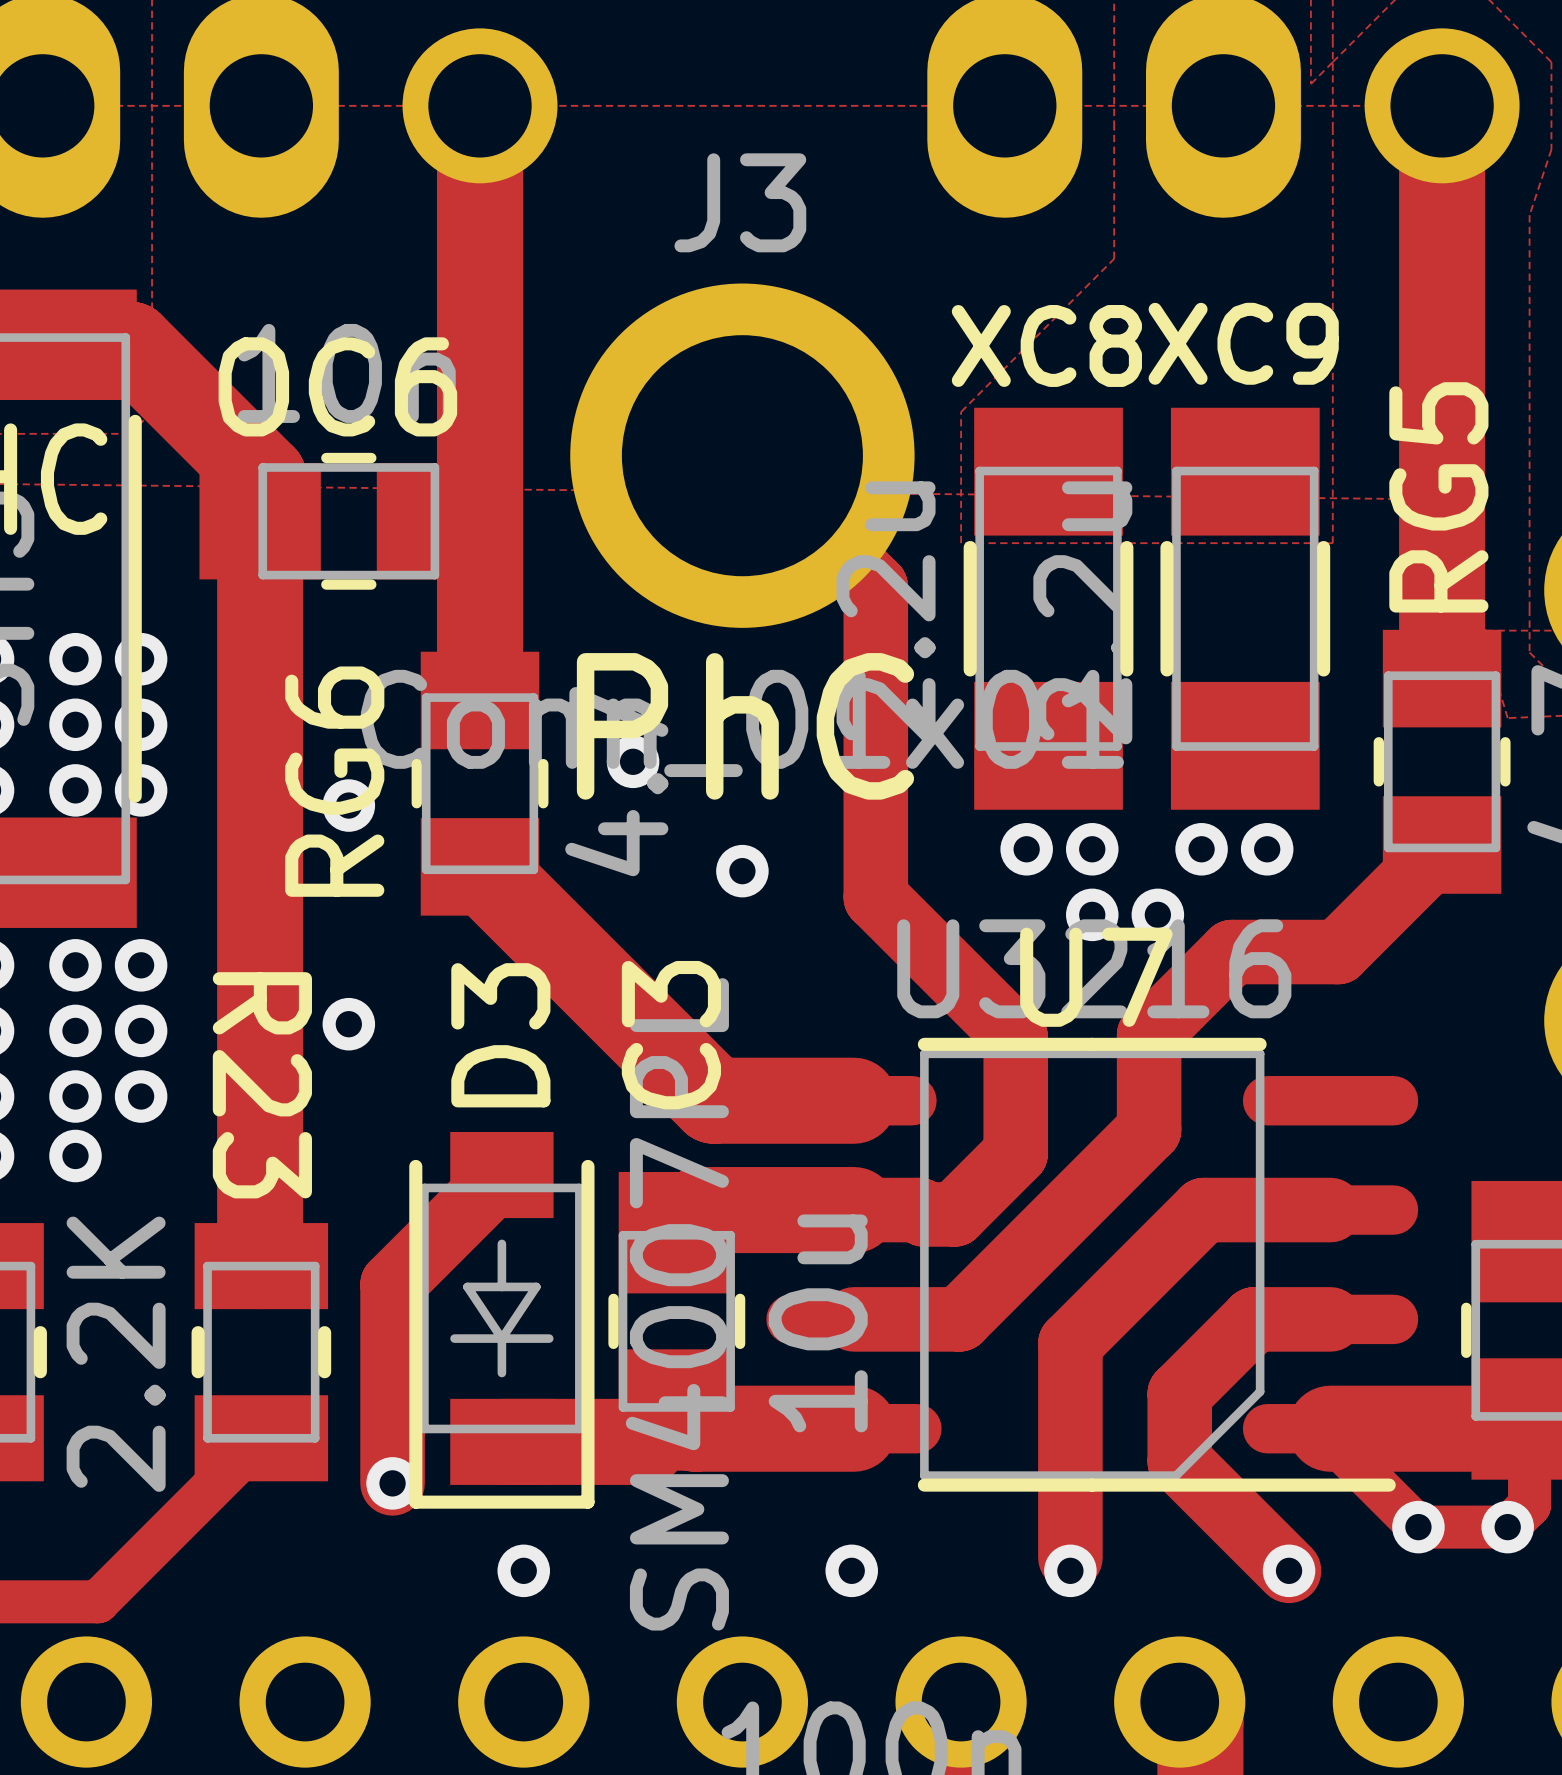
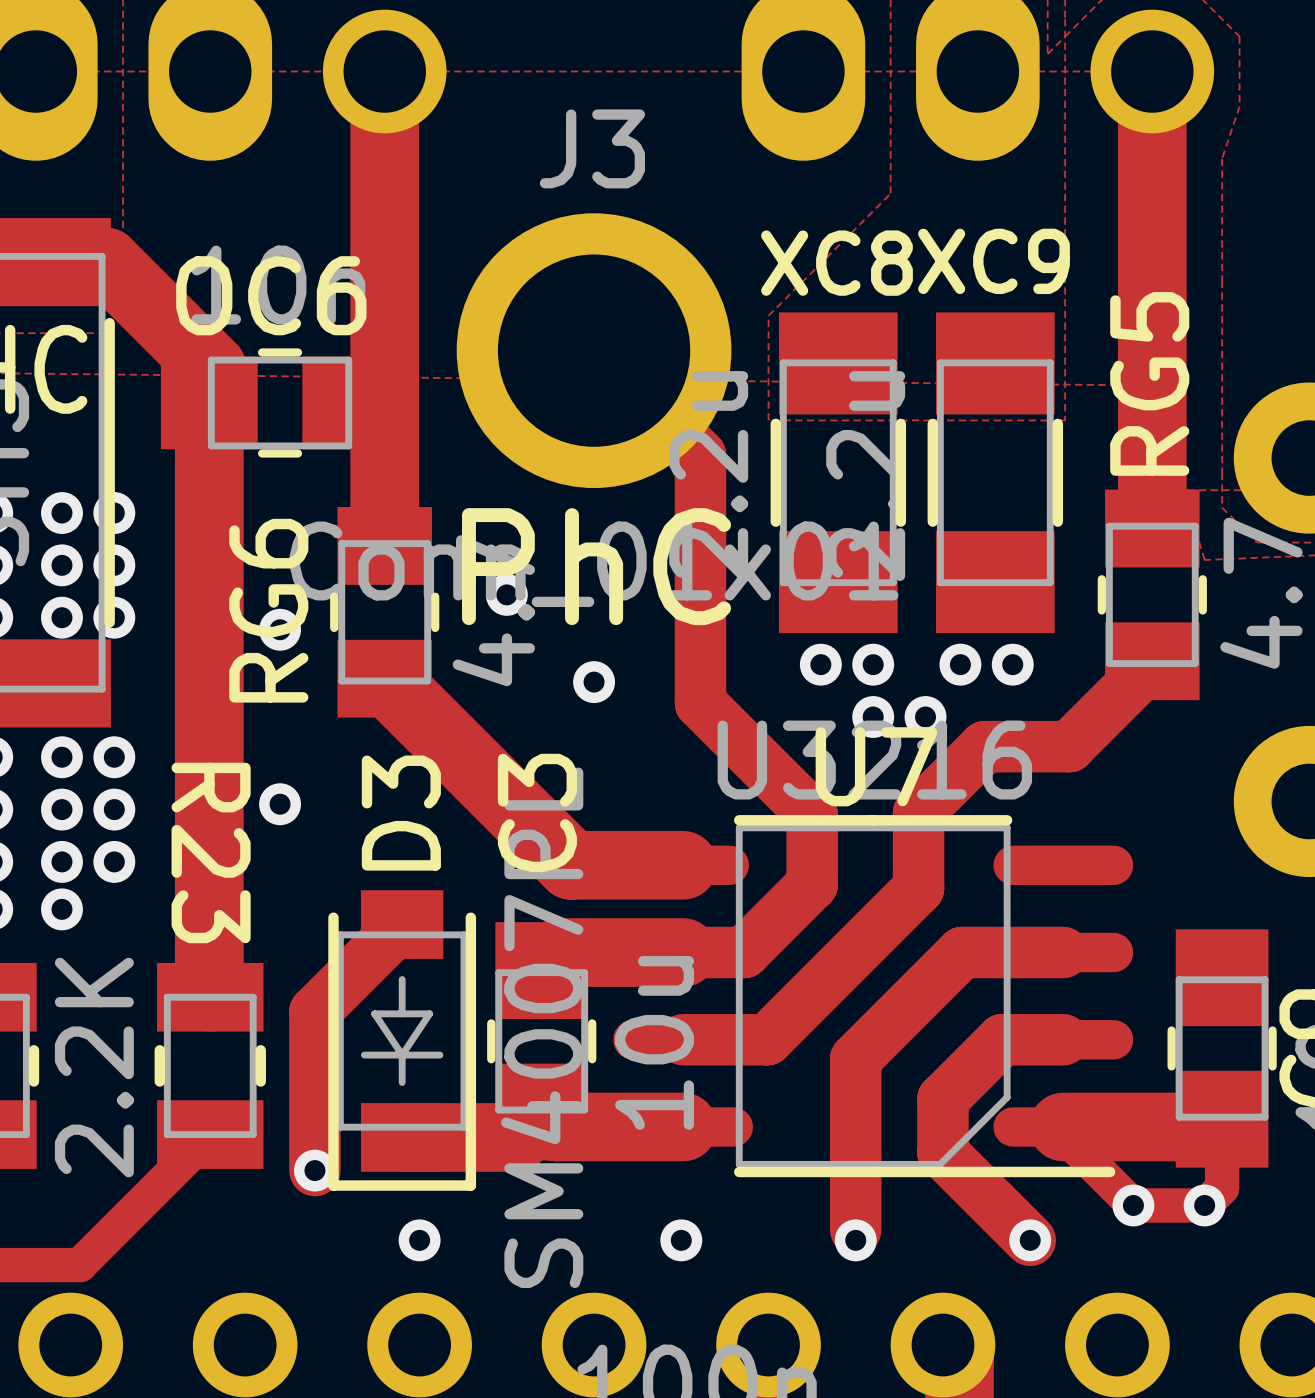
track: (1015, 1124) (1015, 1153) (954, 1214) (923, 1214) (919, 1210) -> (812, 884) (744, 952) (735, 952)

